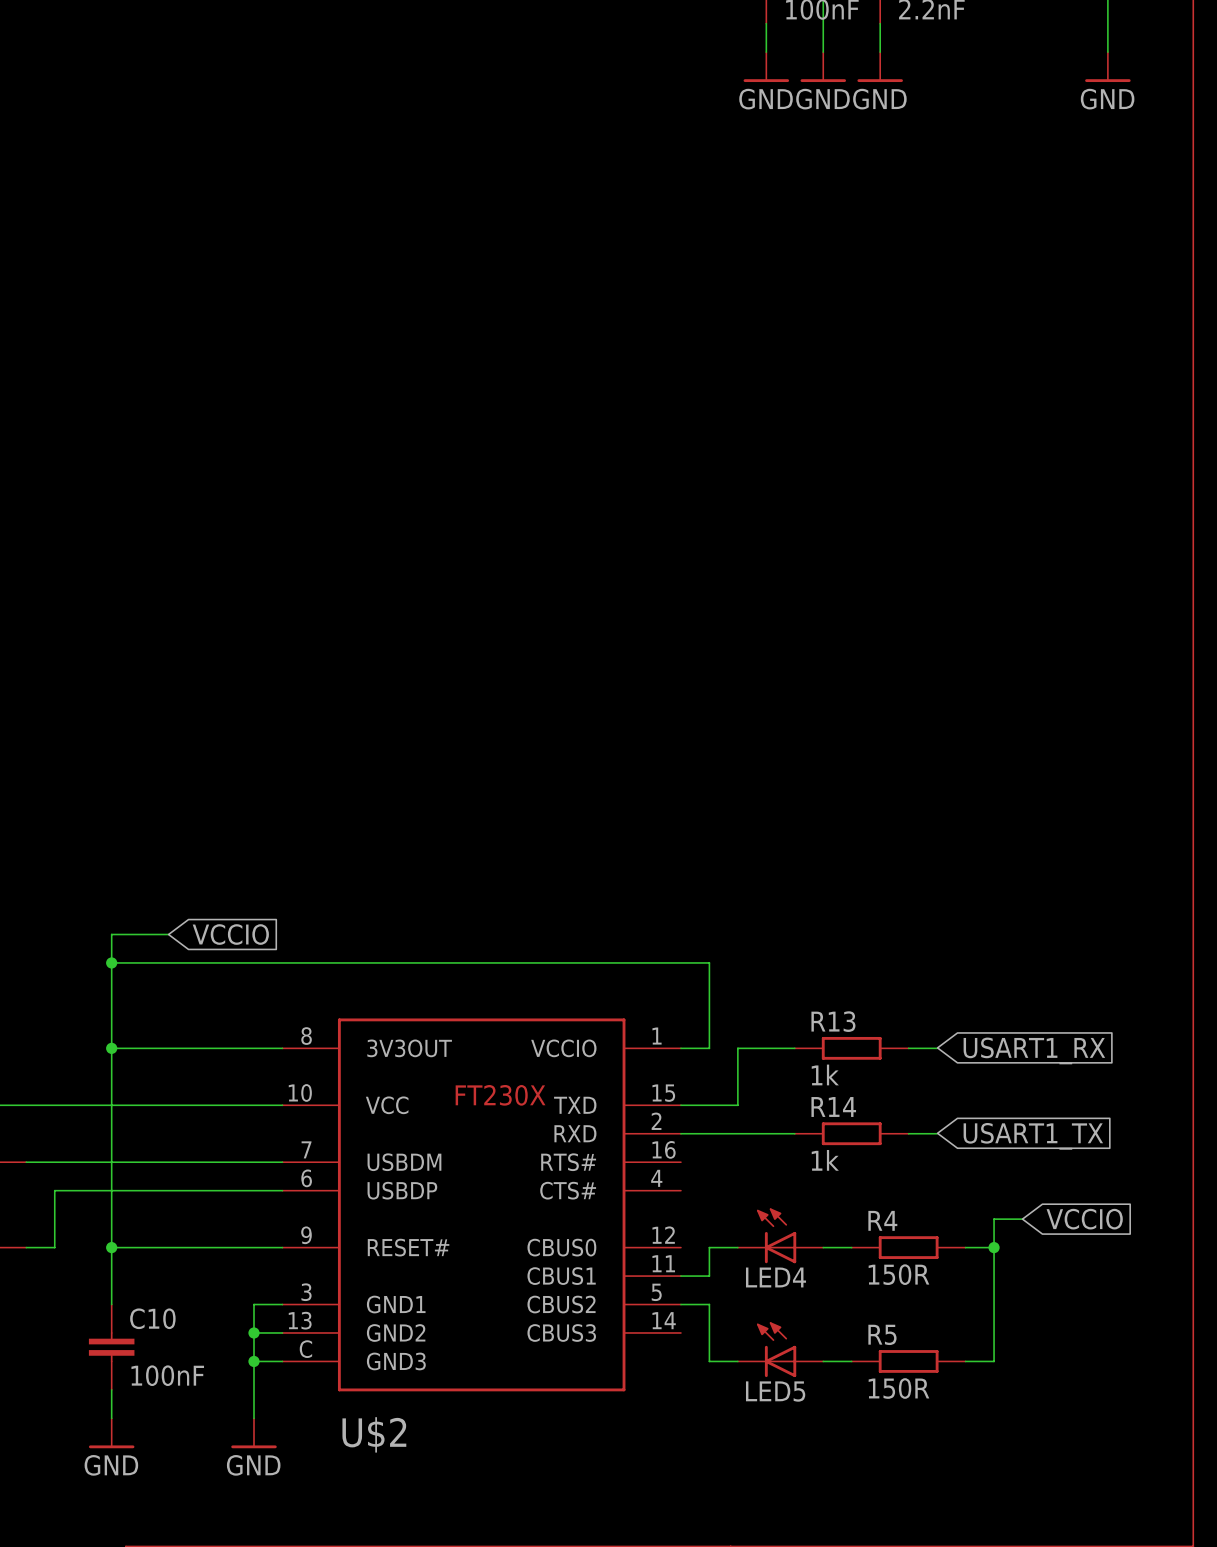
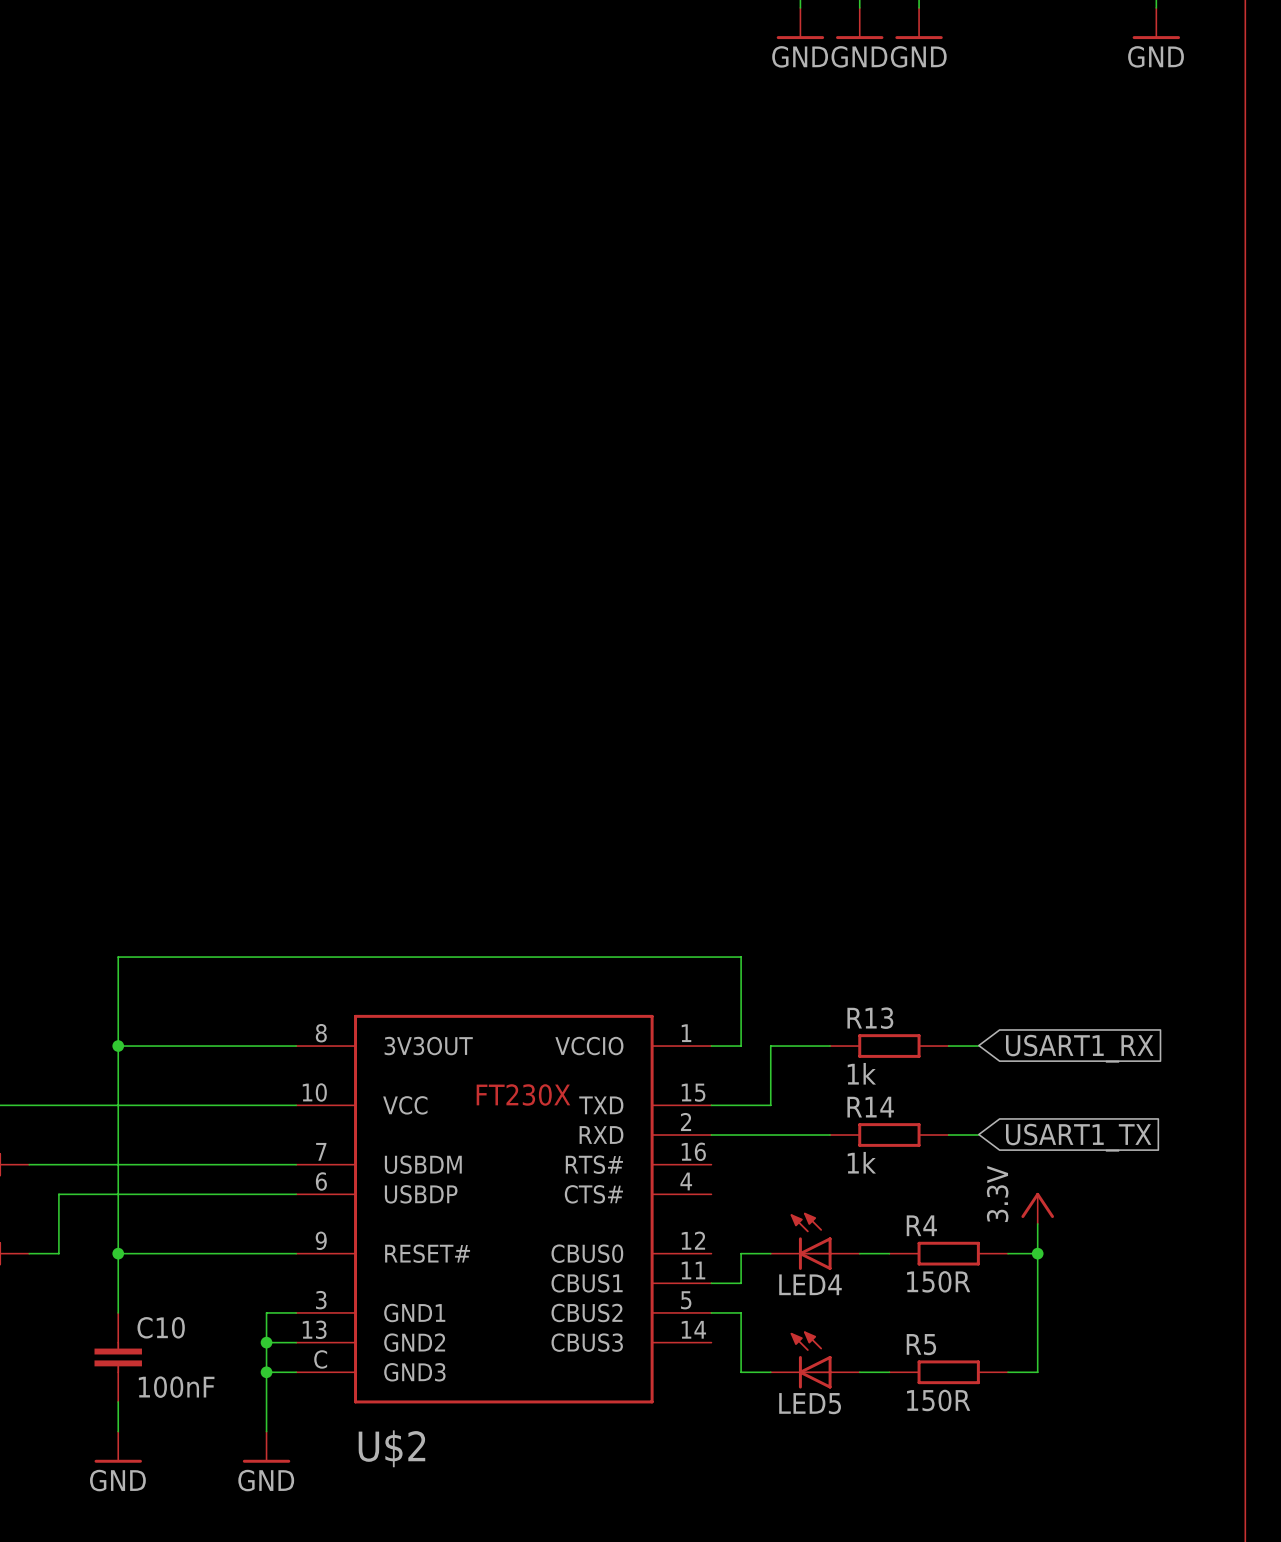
wire: (168, 934) (111, 934) (111, 962) -> none
global label: VCCIO (230, 934) -> none
junction: (111, 962) -> none
power symbol: none -> 3.3V (1037, 1208)
wire: (994, 1219) (1022, 1219) -> none
global label: VCCIO (1084, 1219) -> none

